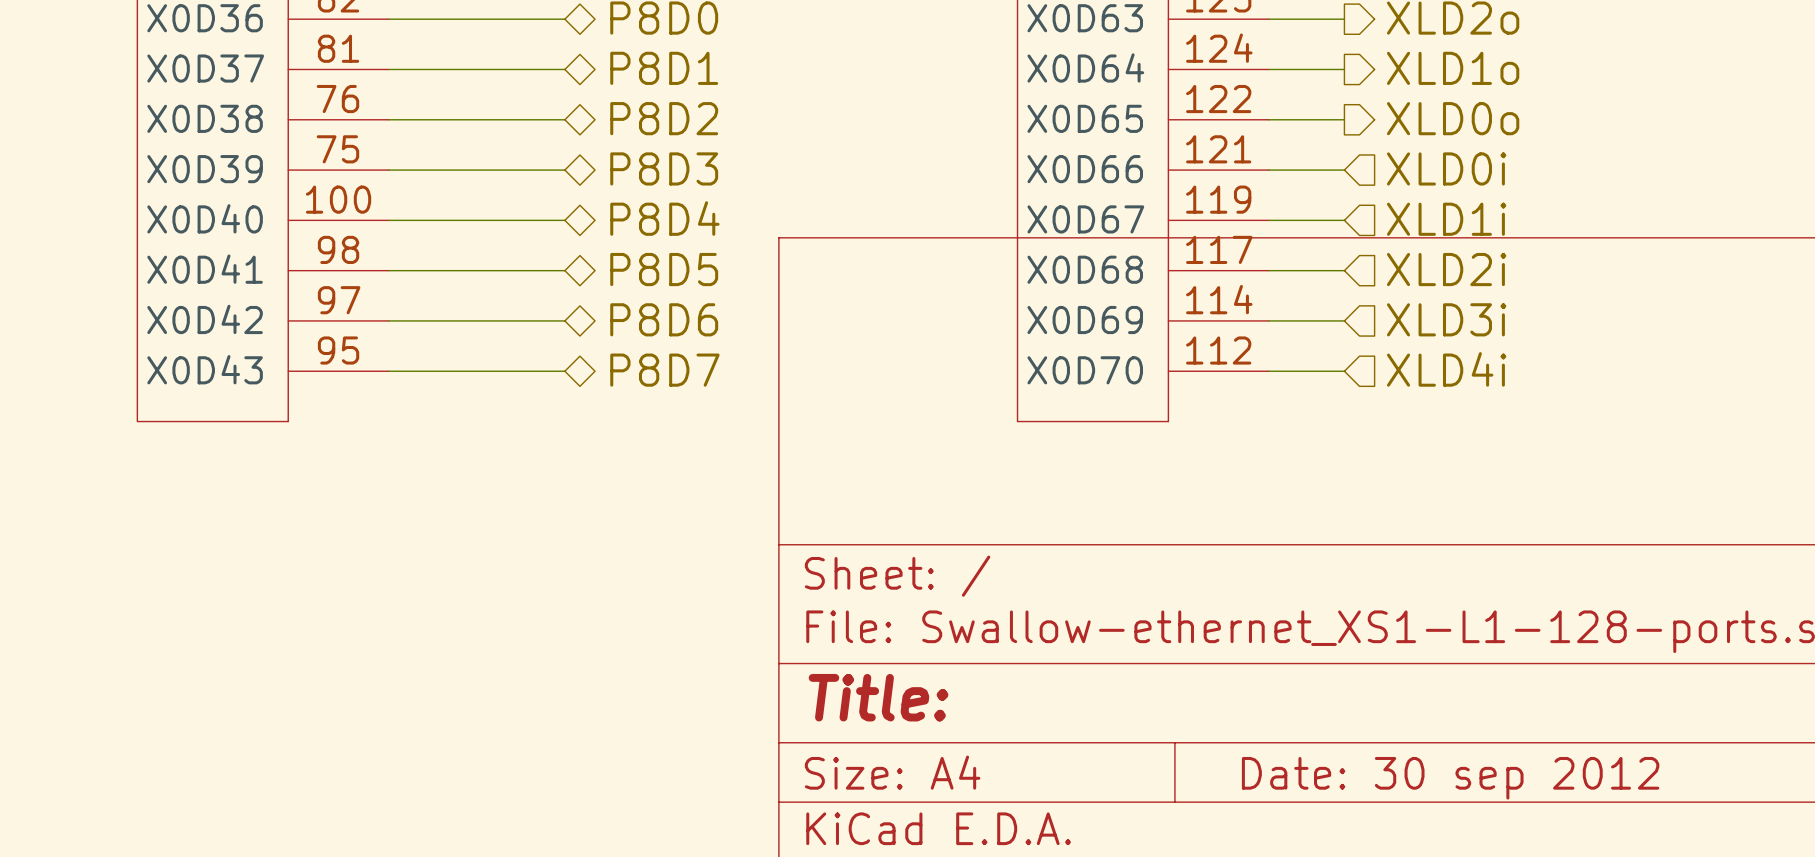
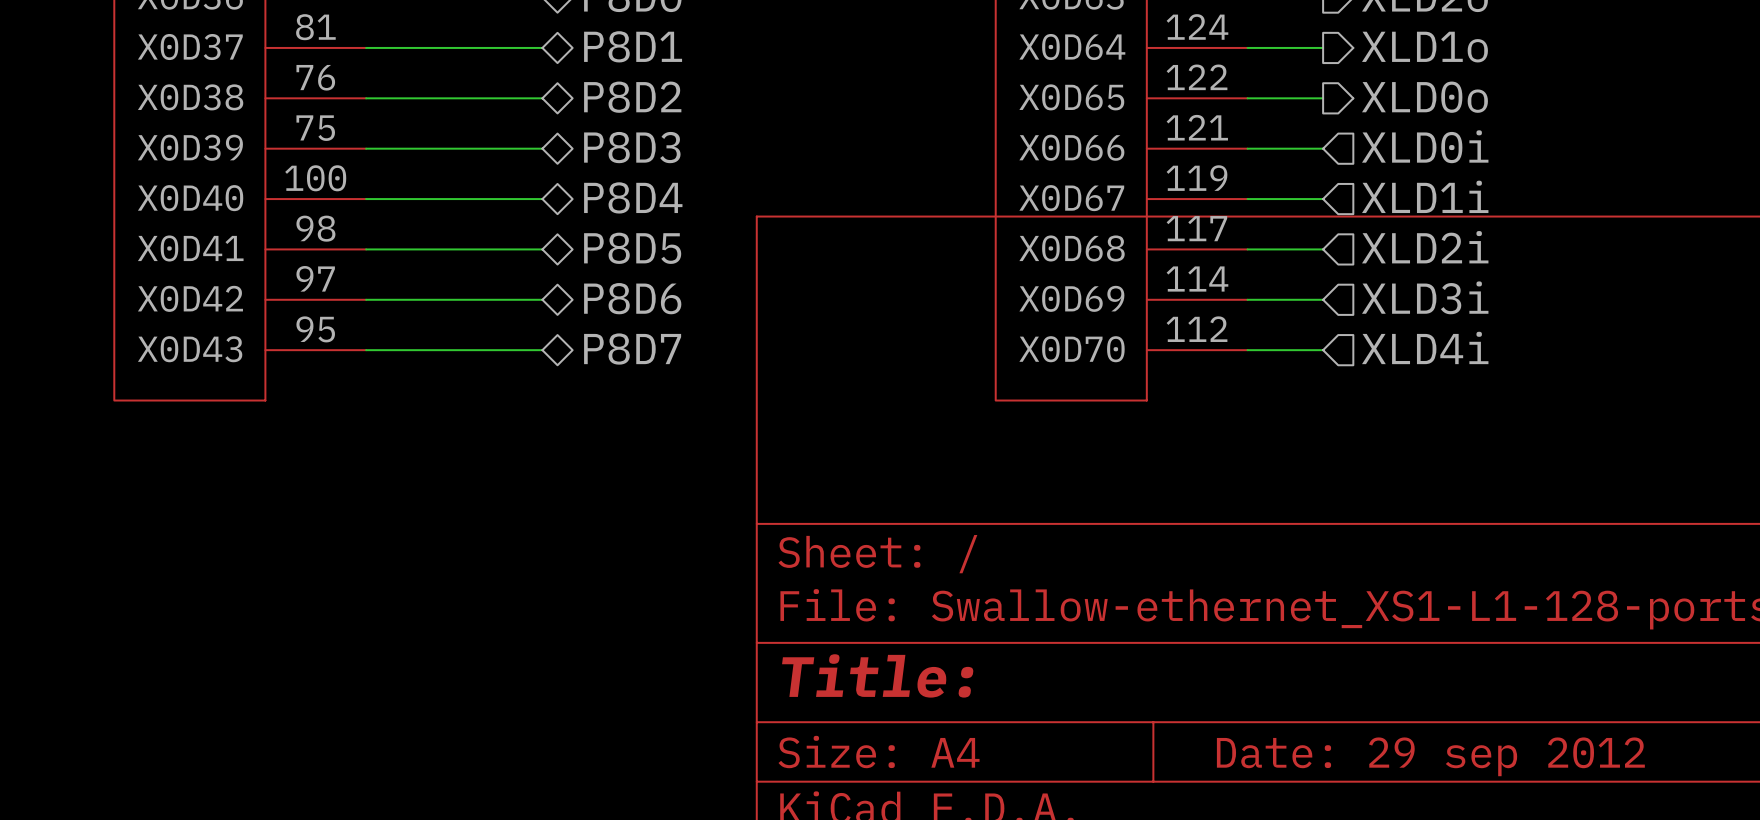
title block: Date: 30 sep 2012 (1450, 778) -> Date: 29 sep 2012 (1430, 756)

